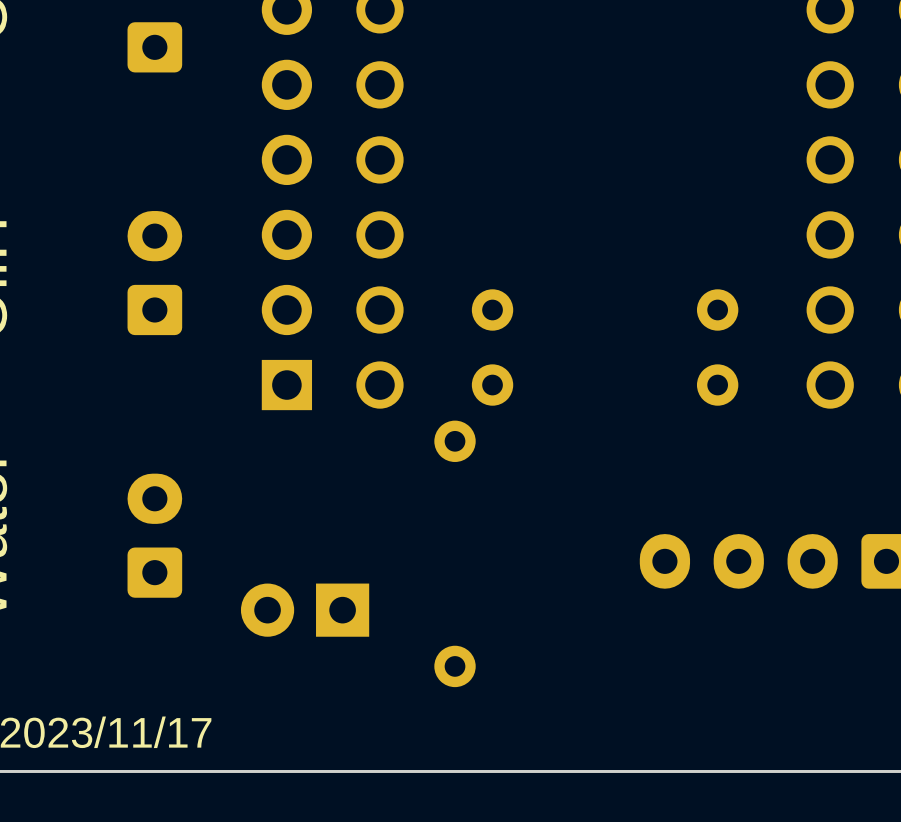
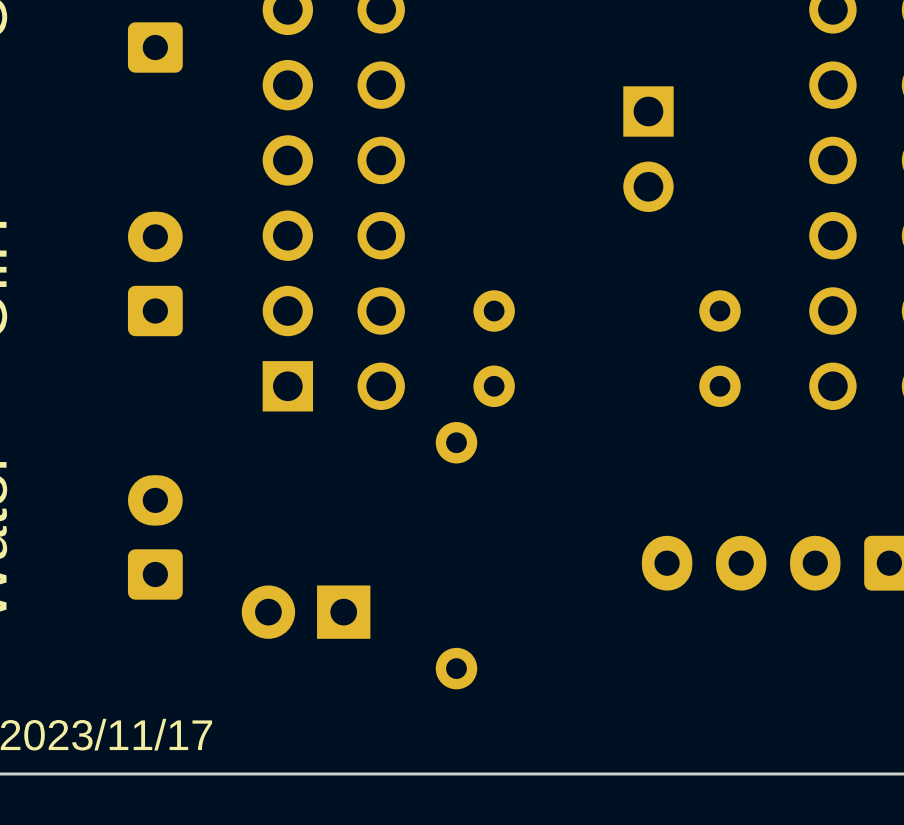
part: none -> (648, 149)

